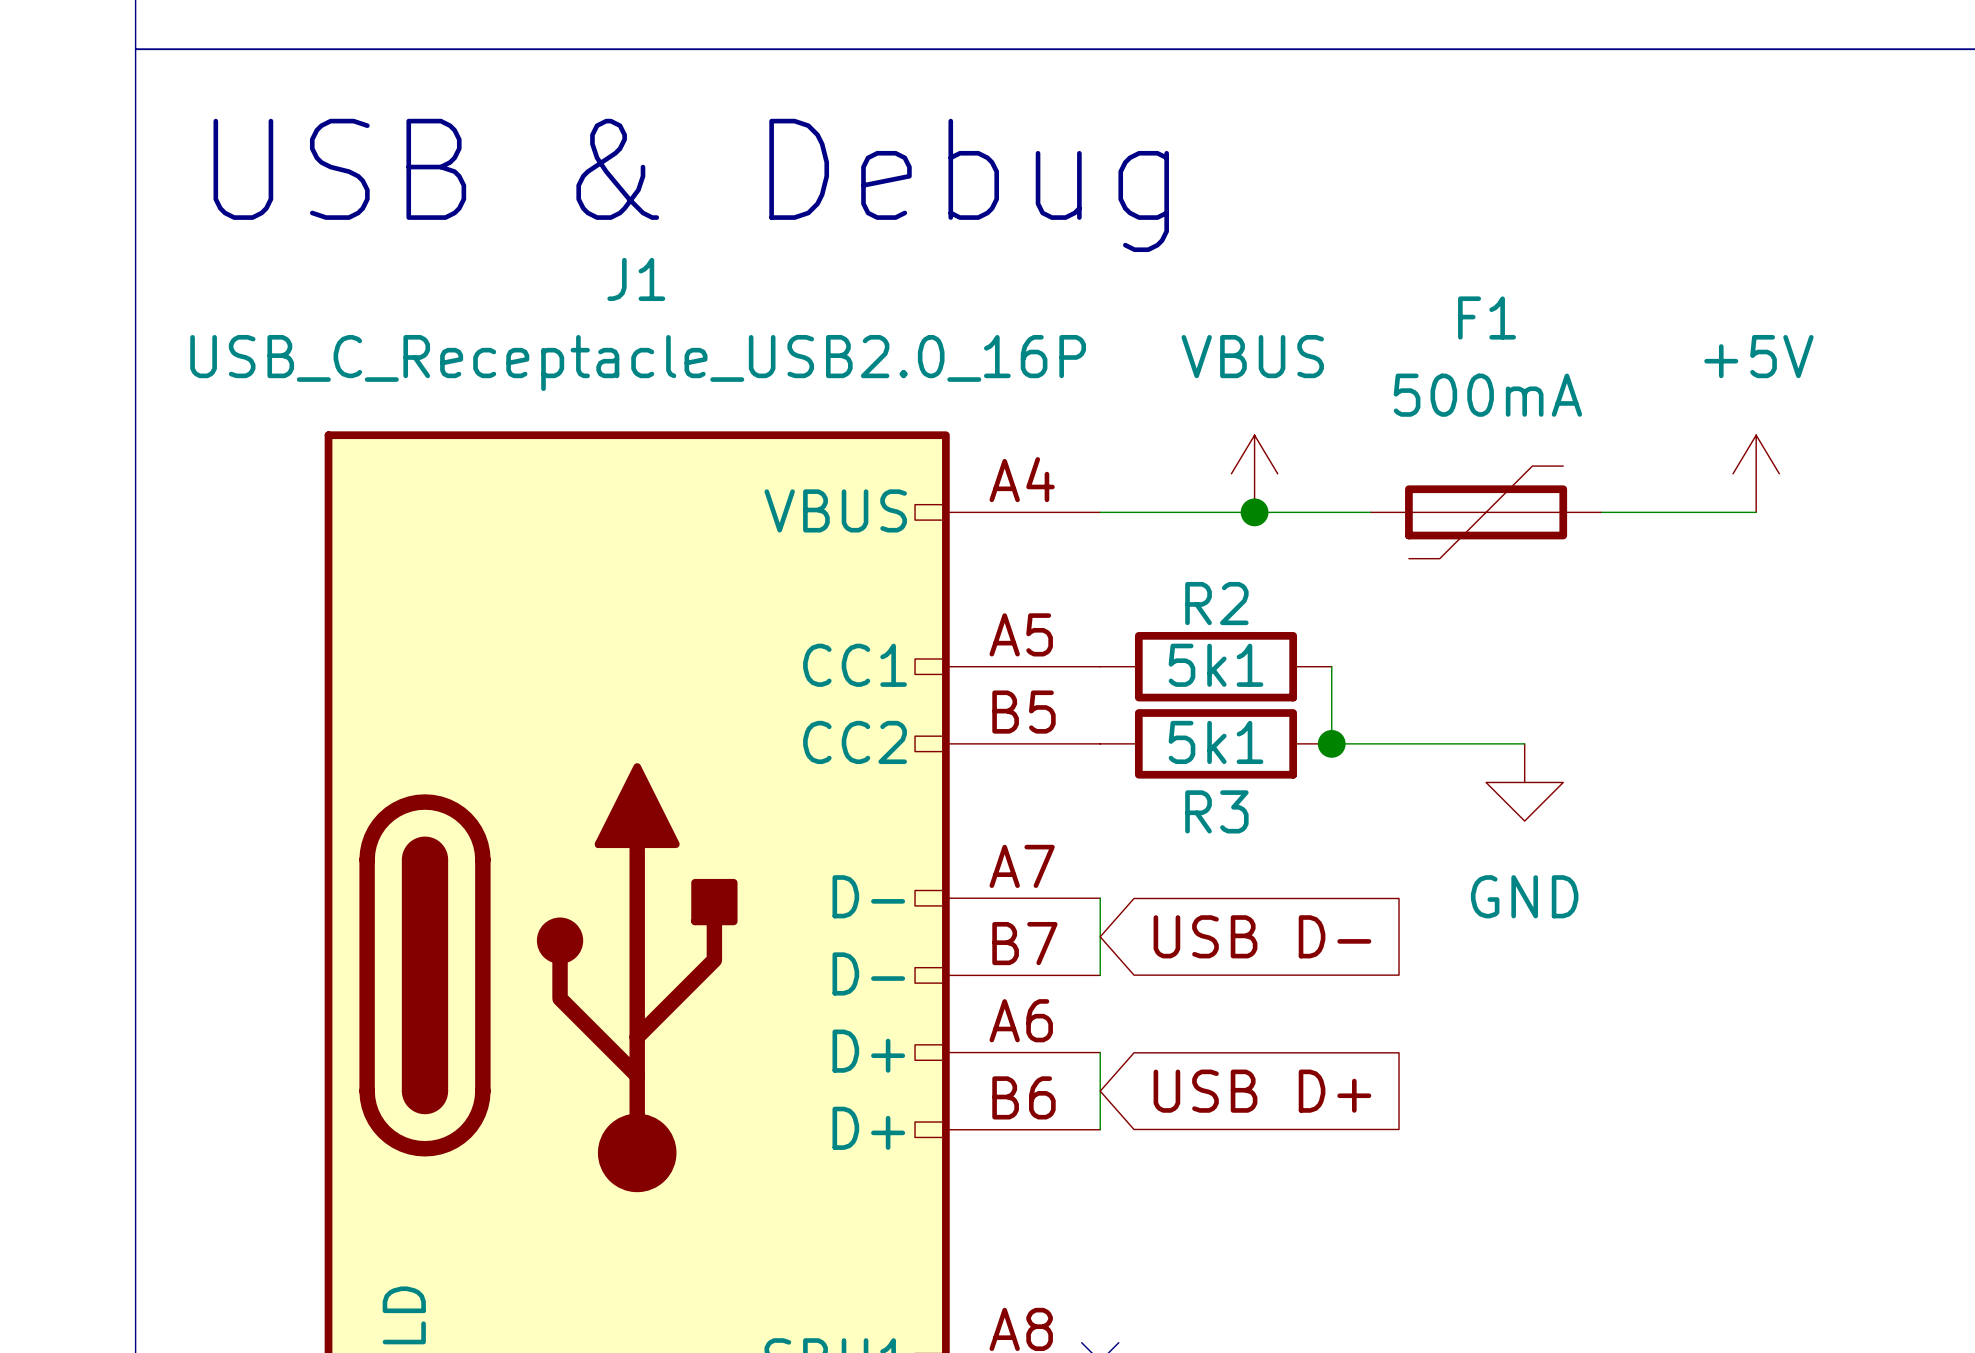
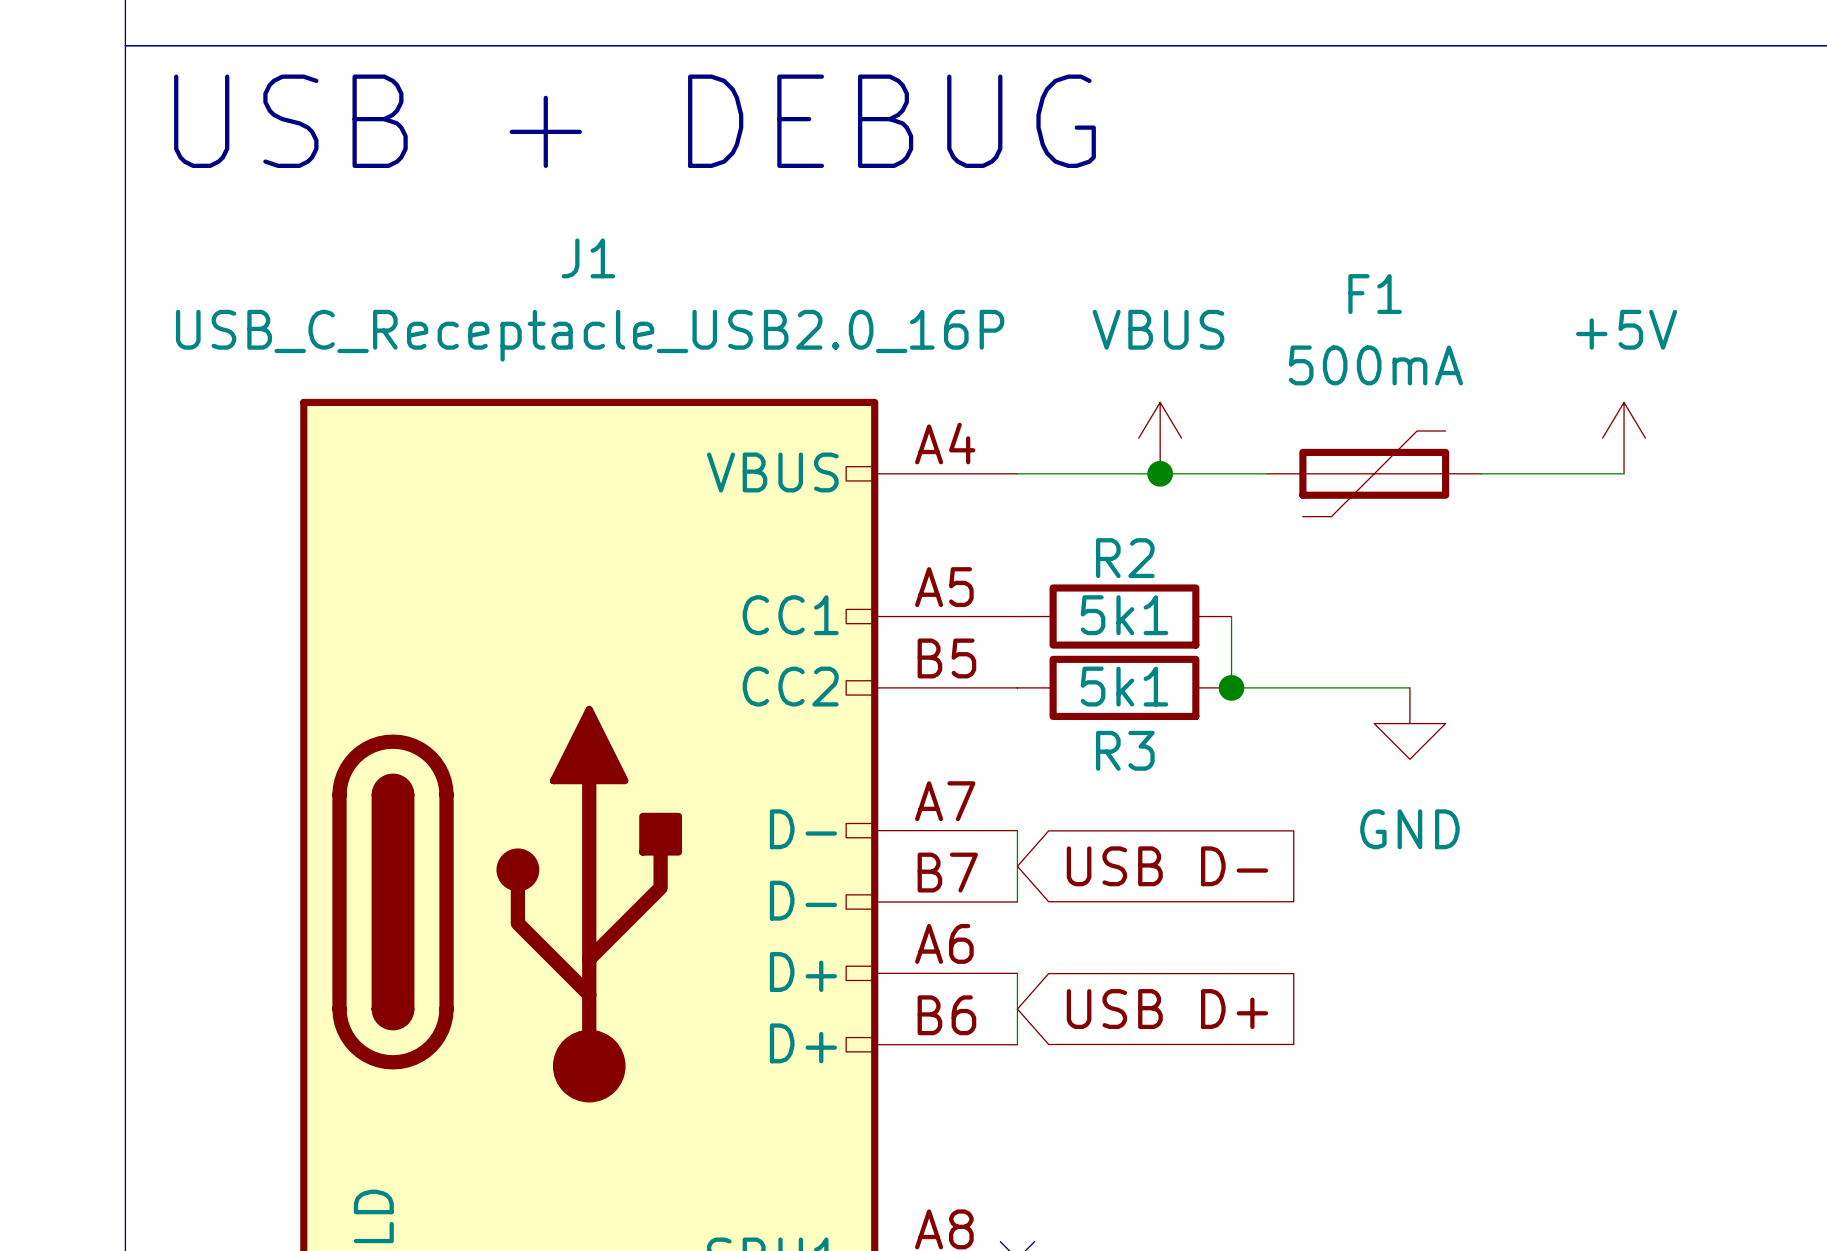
text: none -> USB + DEBUG (634, 121)
text: USB & Debug (691, 185) -> none

